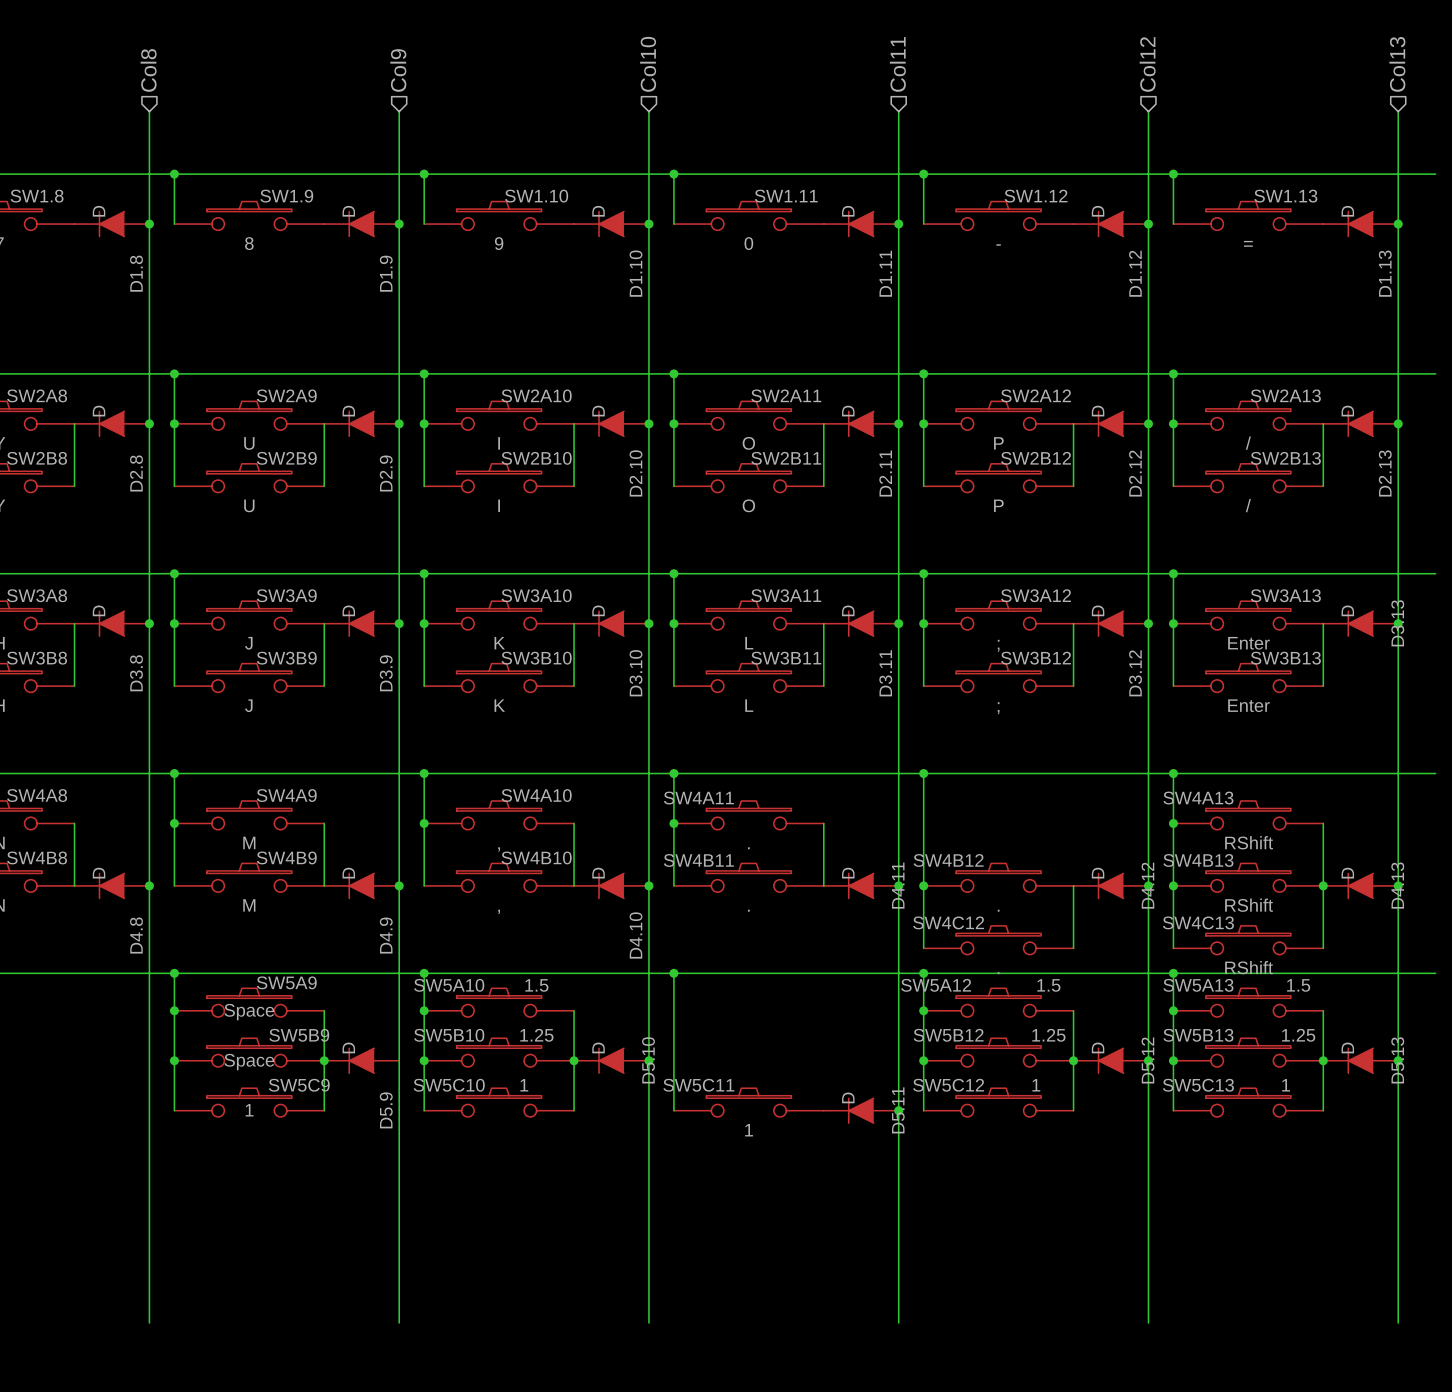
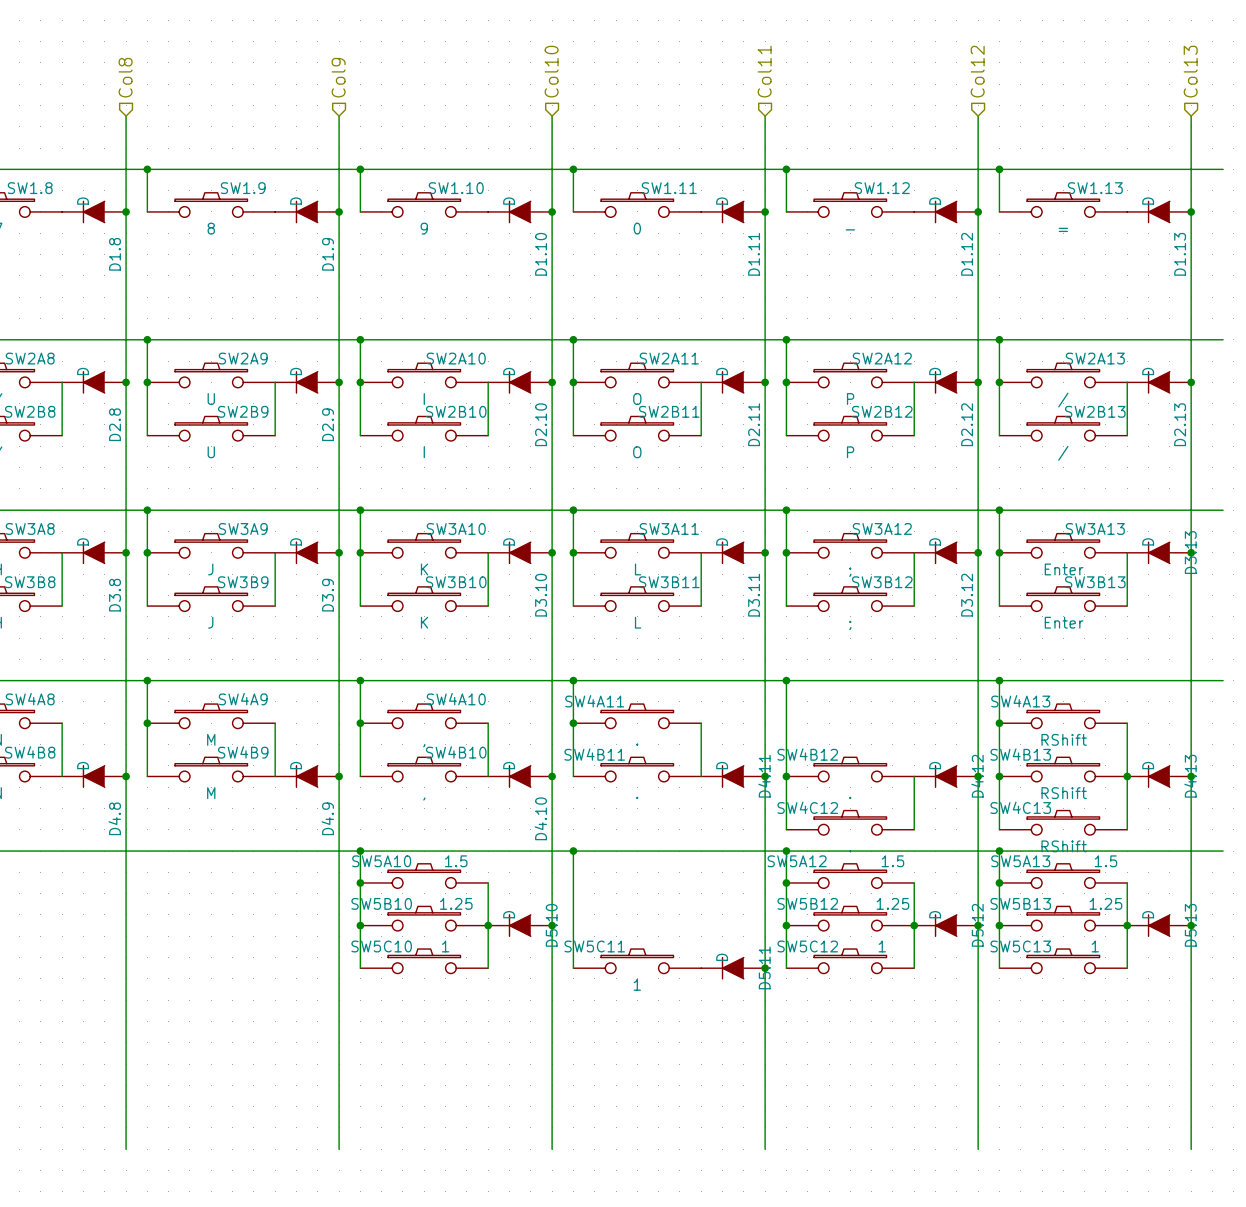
wire: (174, 973) (174, 1110) -> none
junction: (174, 973) -> none
SW5A9: Space (249, 1002) -> none
junction: (174, 1010) -> none
wire: (324, 1010) (324, 1110) -> none
SW5B9: Space (249, 1052) -> none
junction: (174, 1060) -> none
junction: (324, 1060) -> none
D5.9: D (361, 1060) -> none
SW5C9: 1 (249, 1102) -> none

